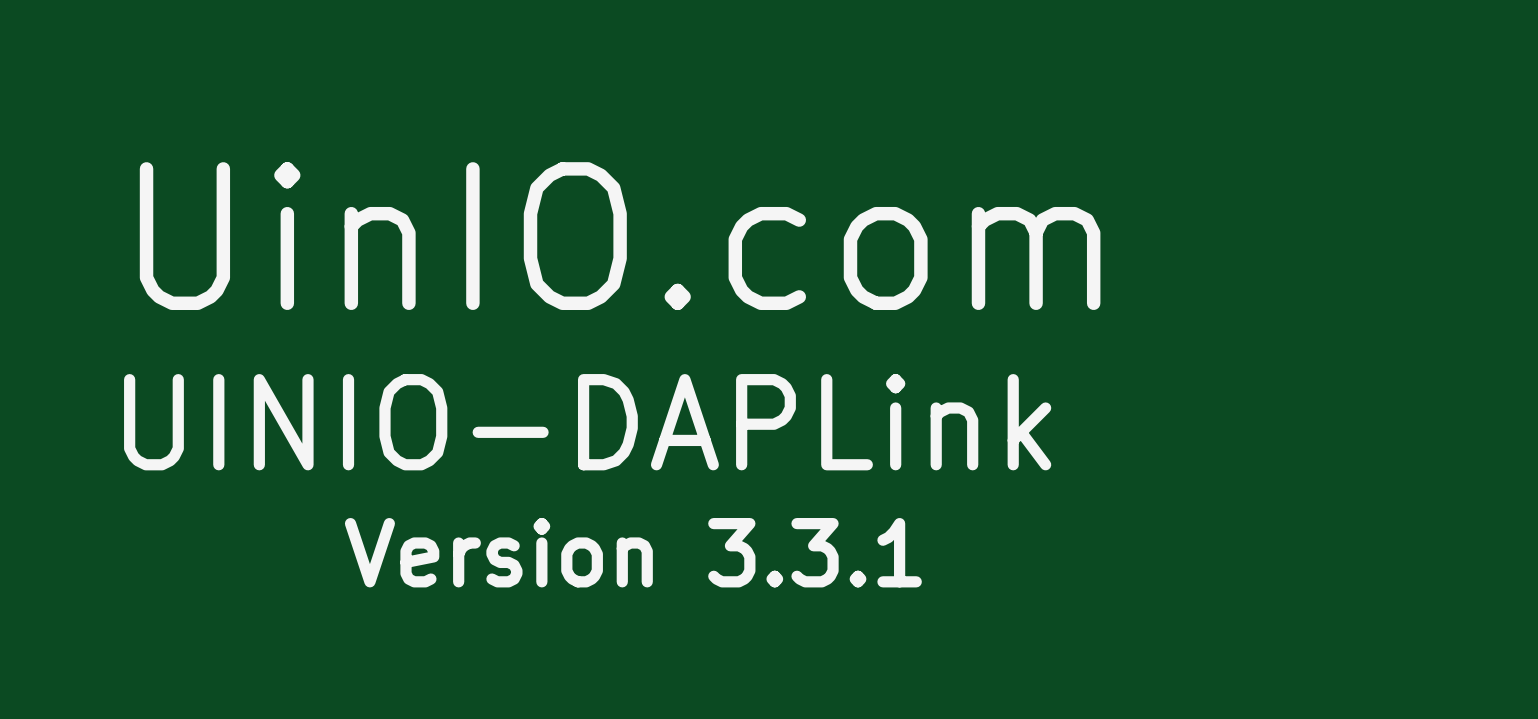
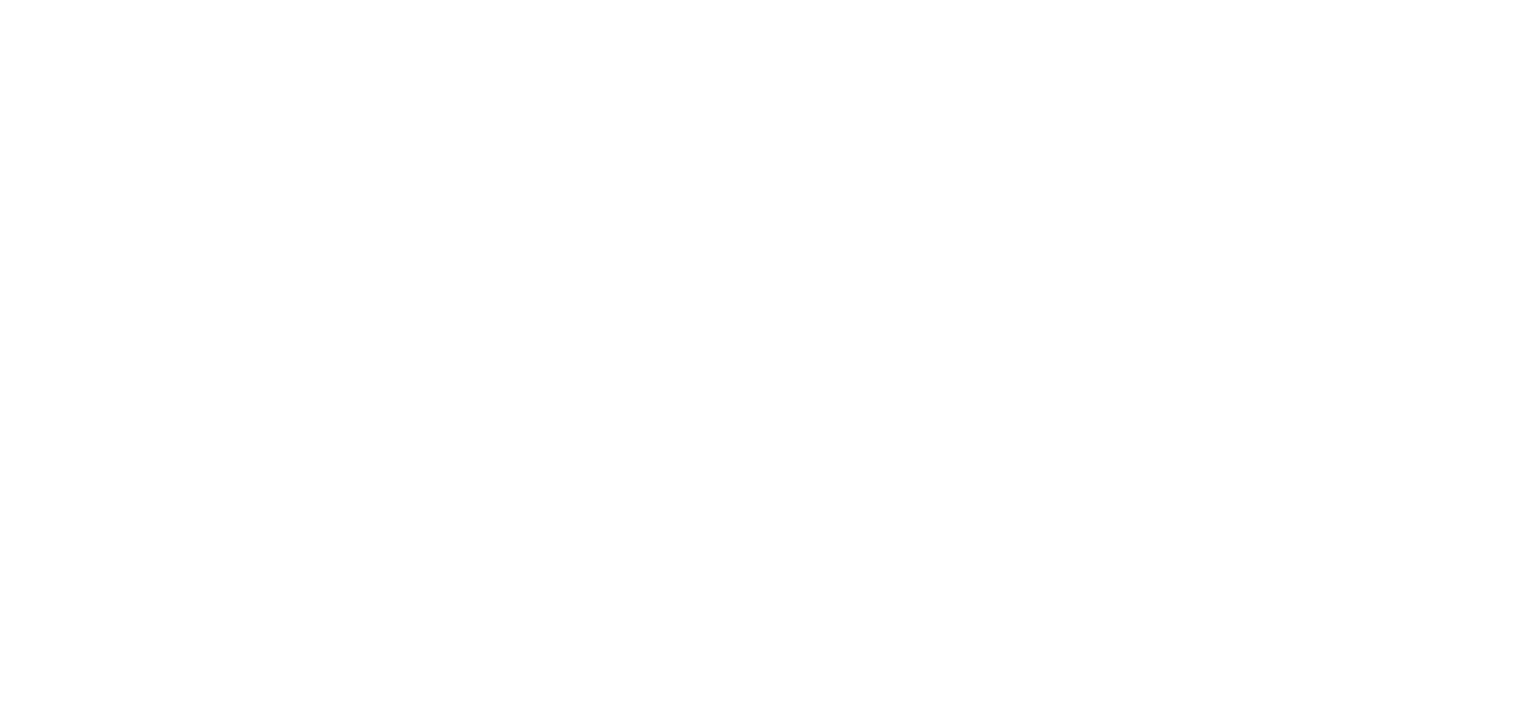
text: UinIO.com (620, 236) -> none
text: UINIO-DAPLink (587, 422) -> none
text: Version 3.3.1 (633, 552) -> none

